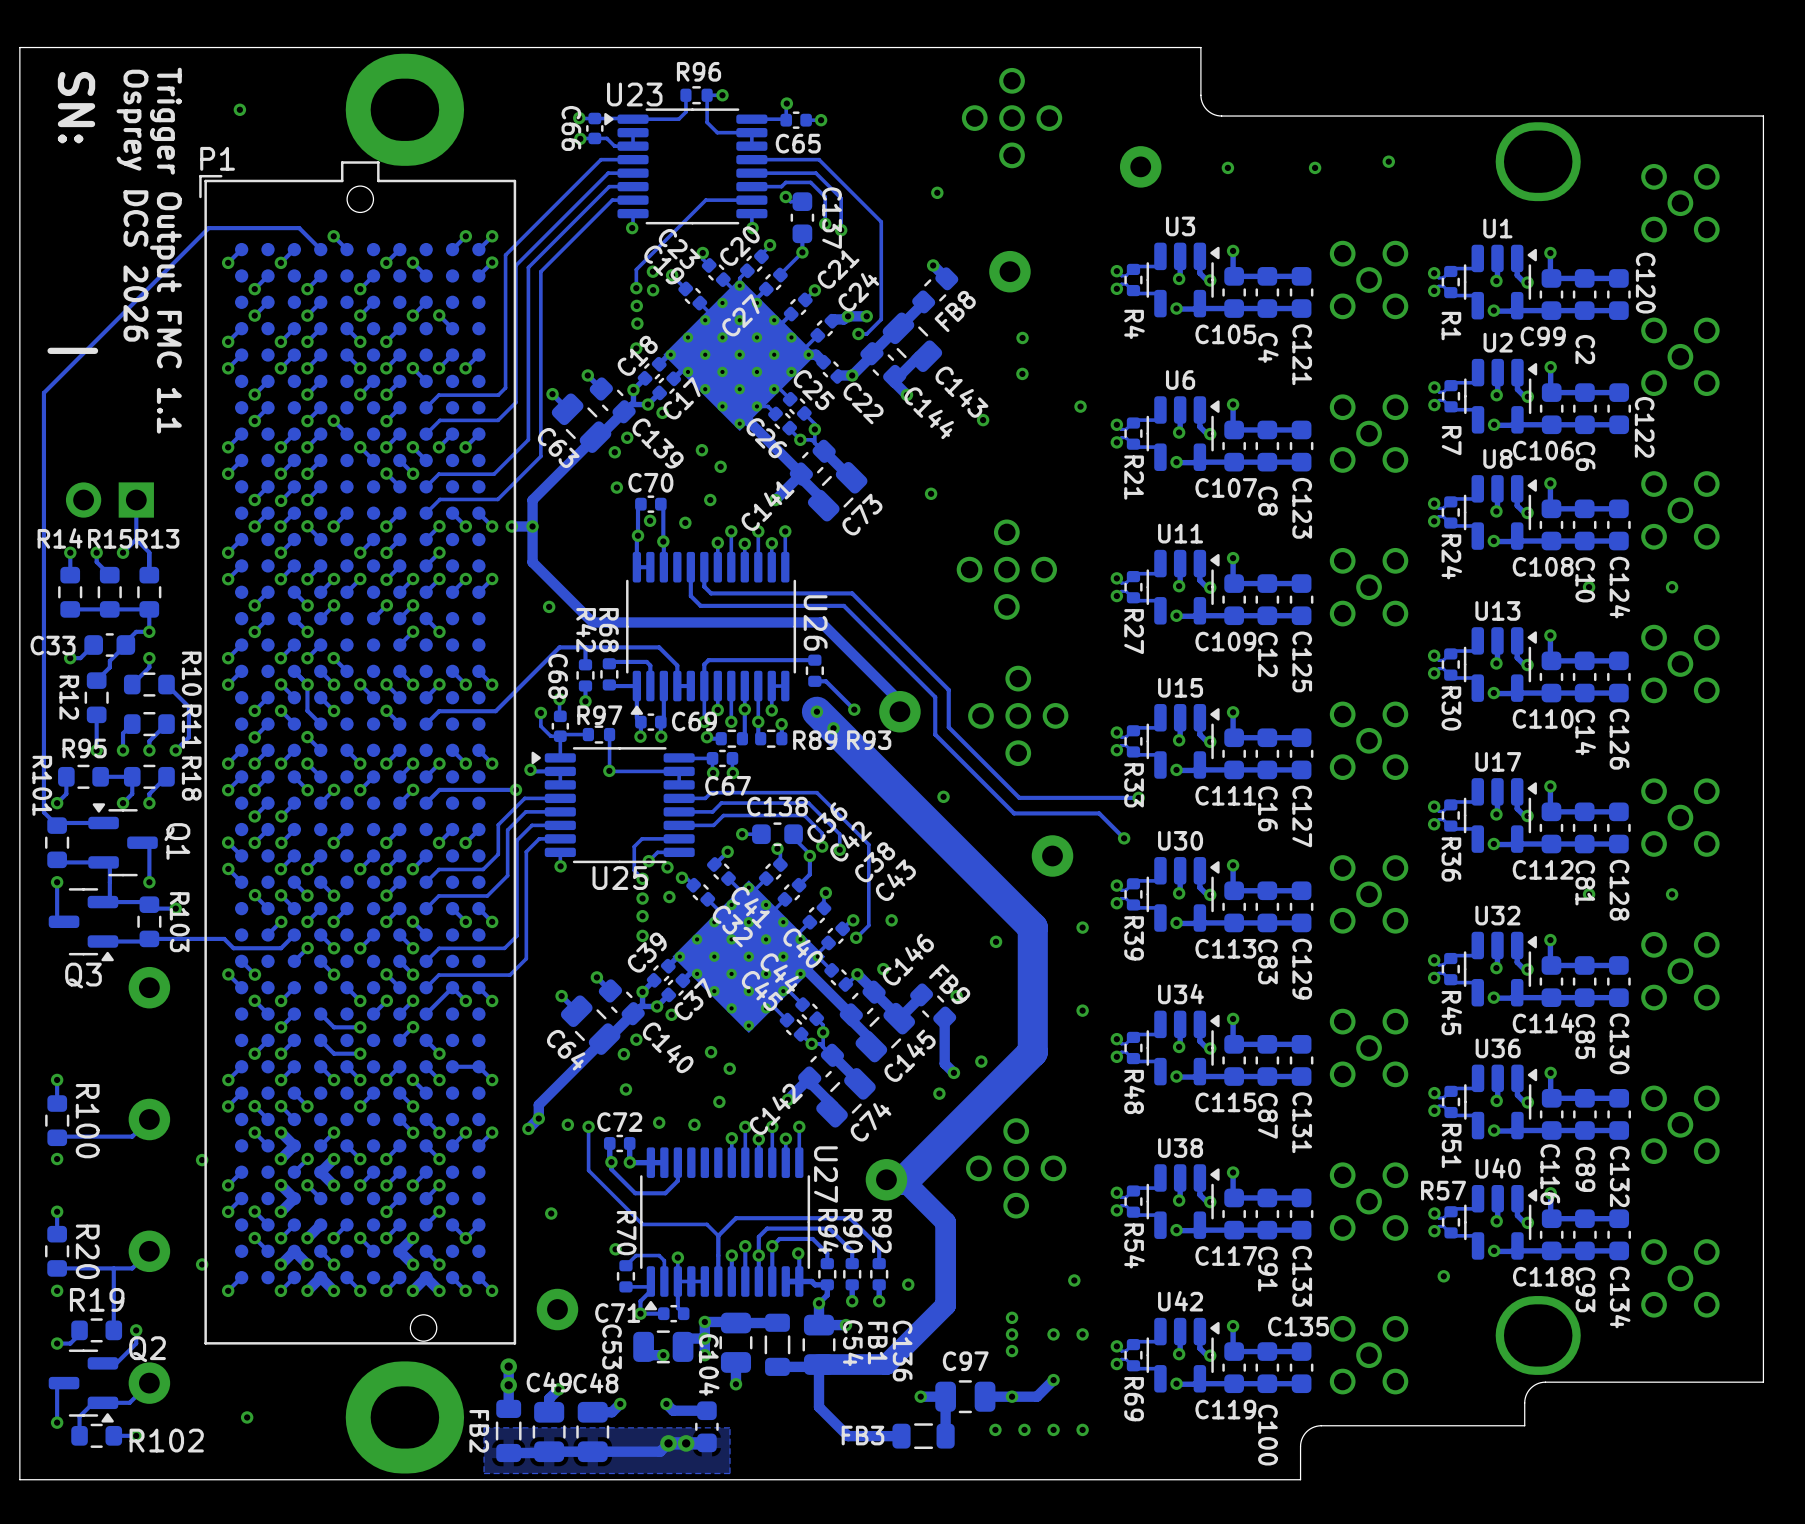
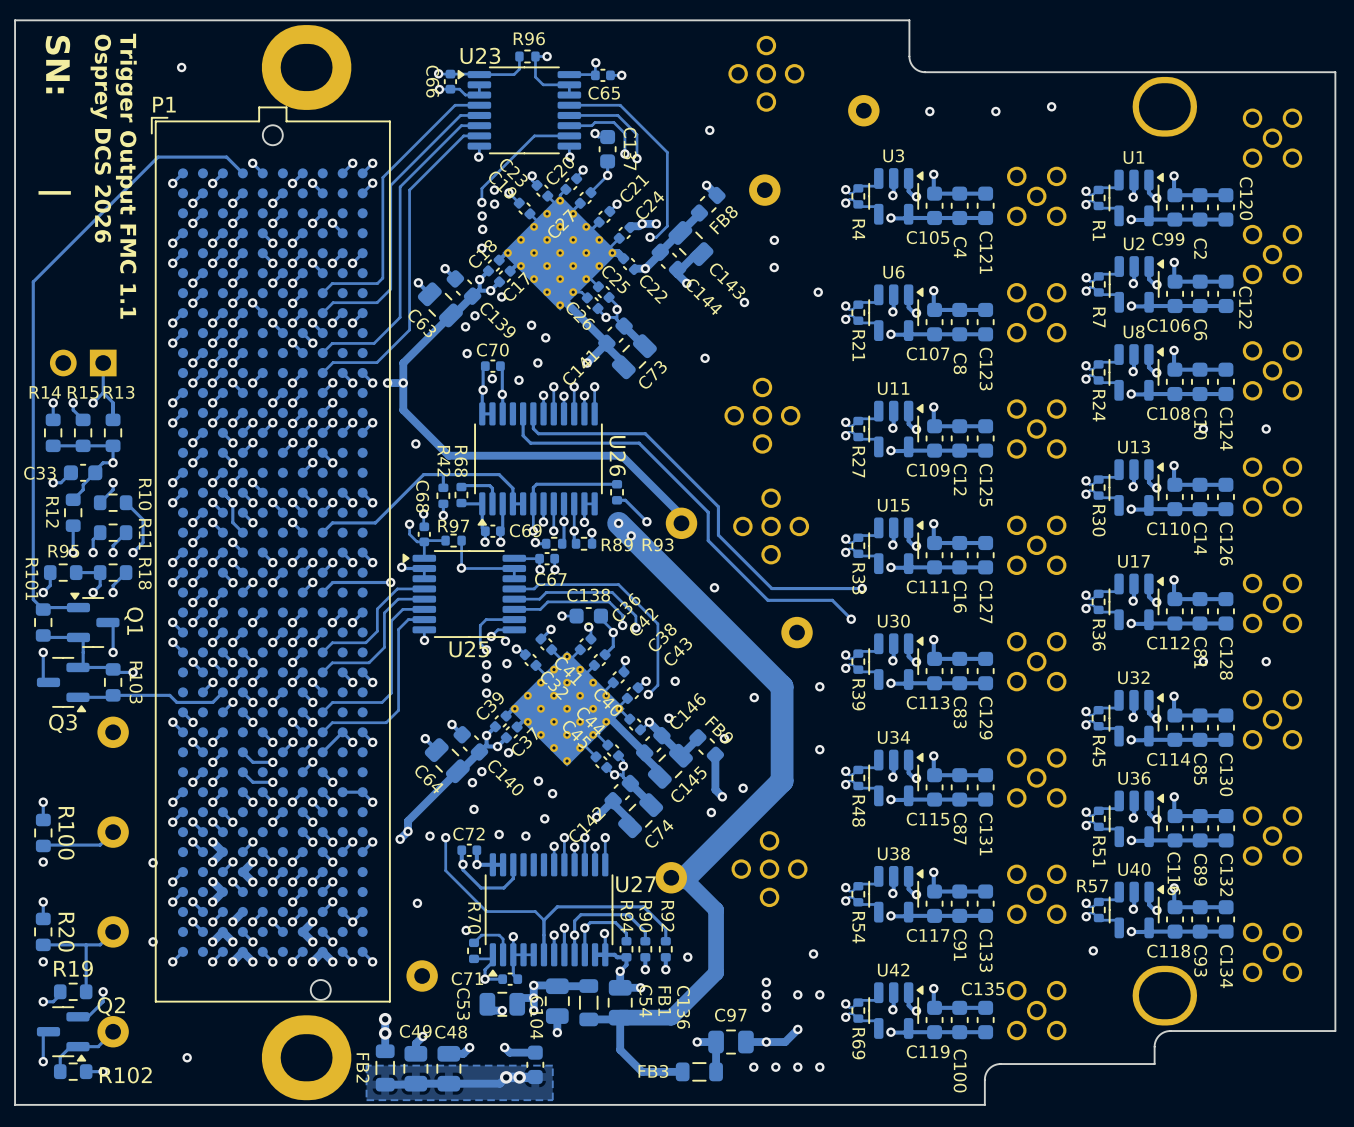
U27 name rotation: 0° (826, 1174) -> 90° counterclockwise (635, 884)

